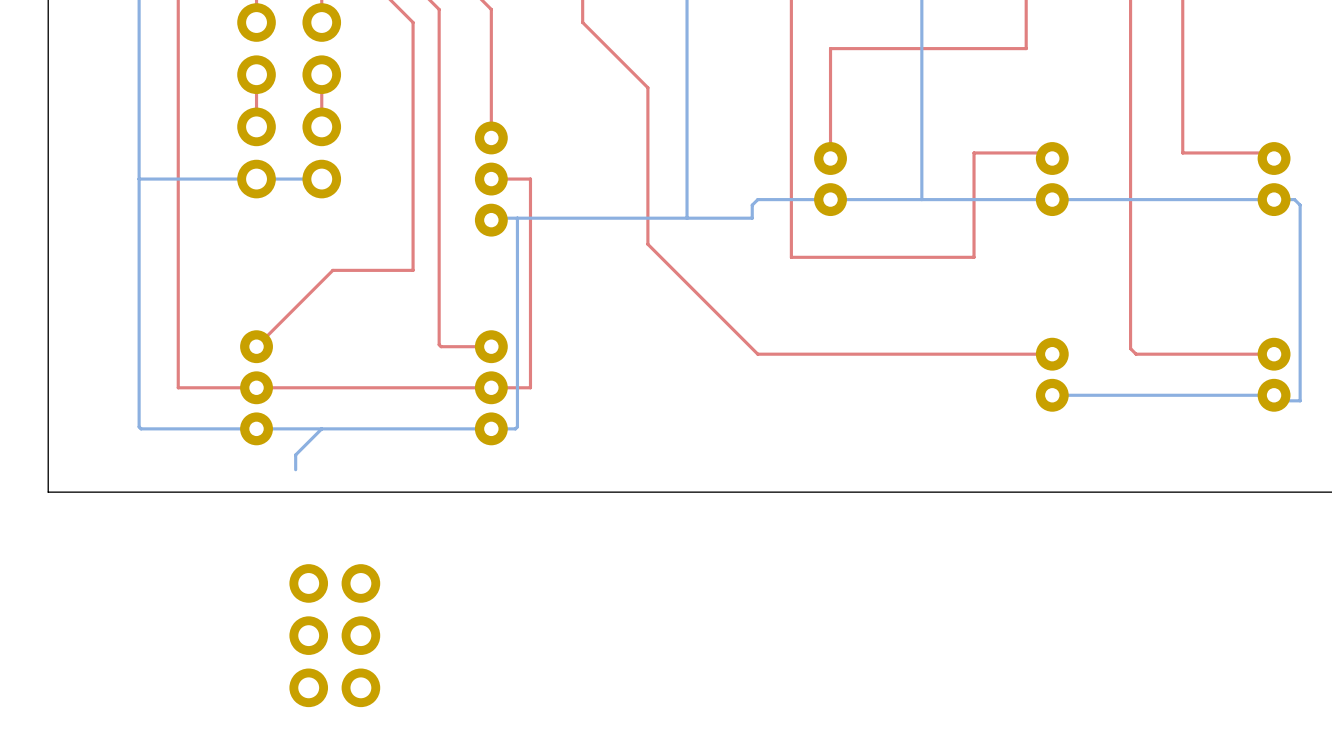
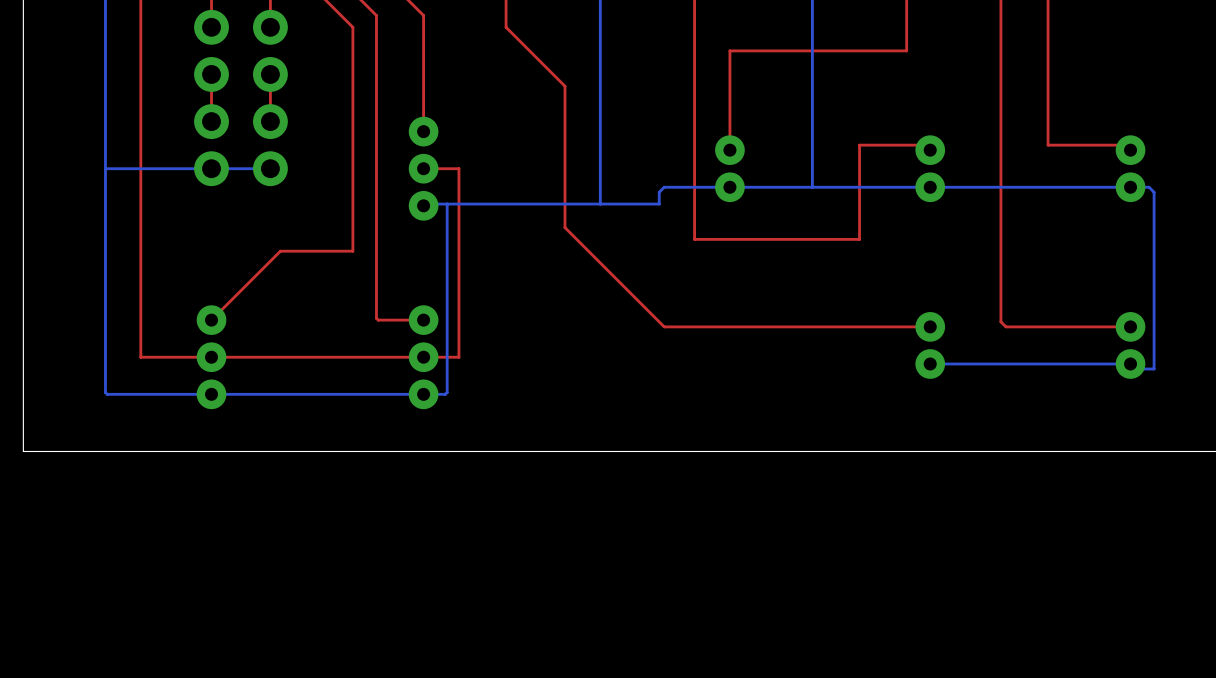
bottom track: (321, 428) (295, 454) (295, 469) -> none
part: (308, 635) -> none
part: (360, 635) -> none

